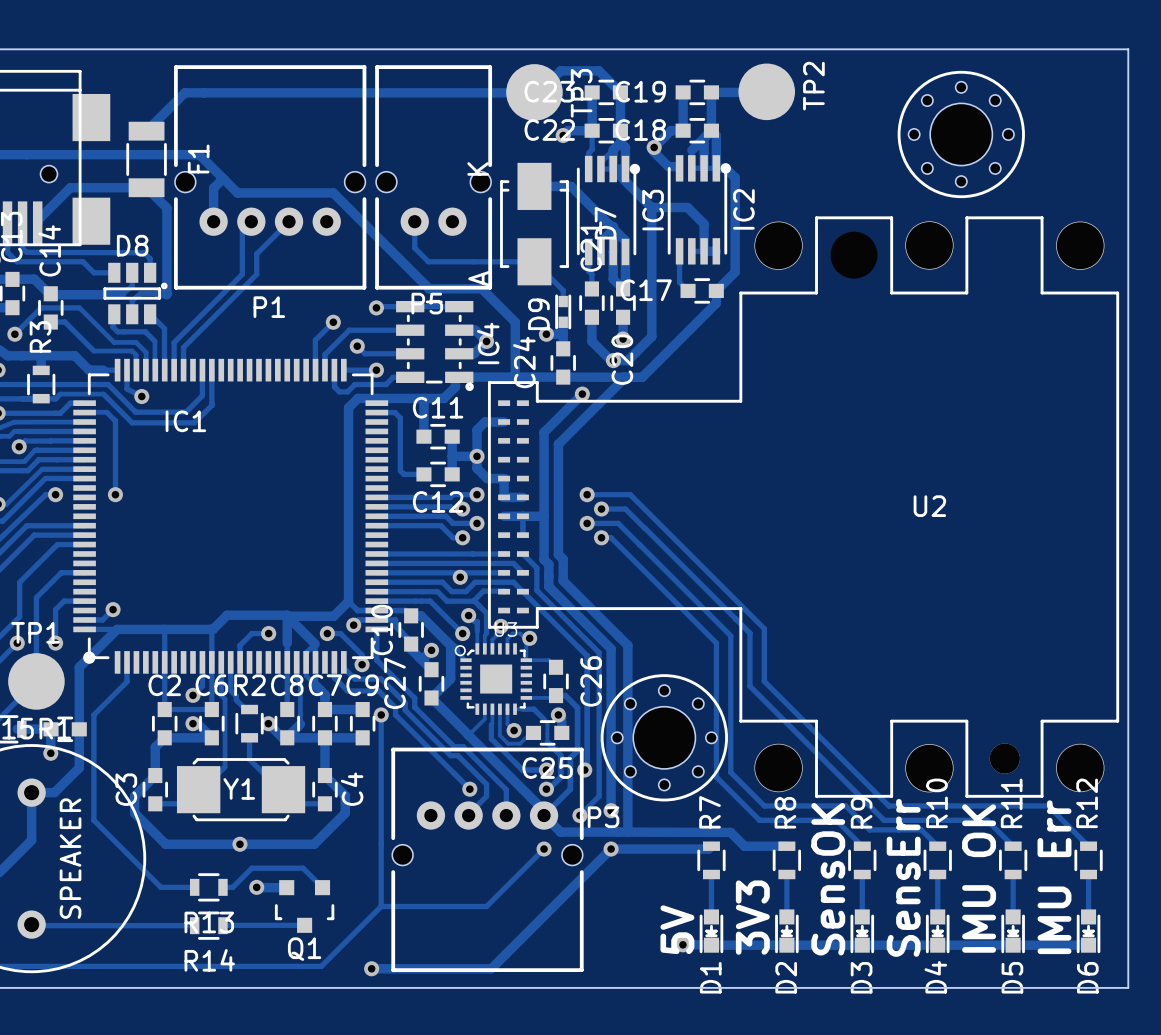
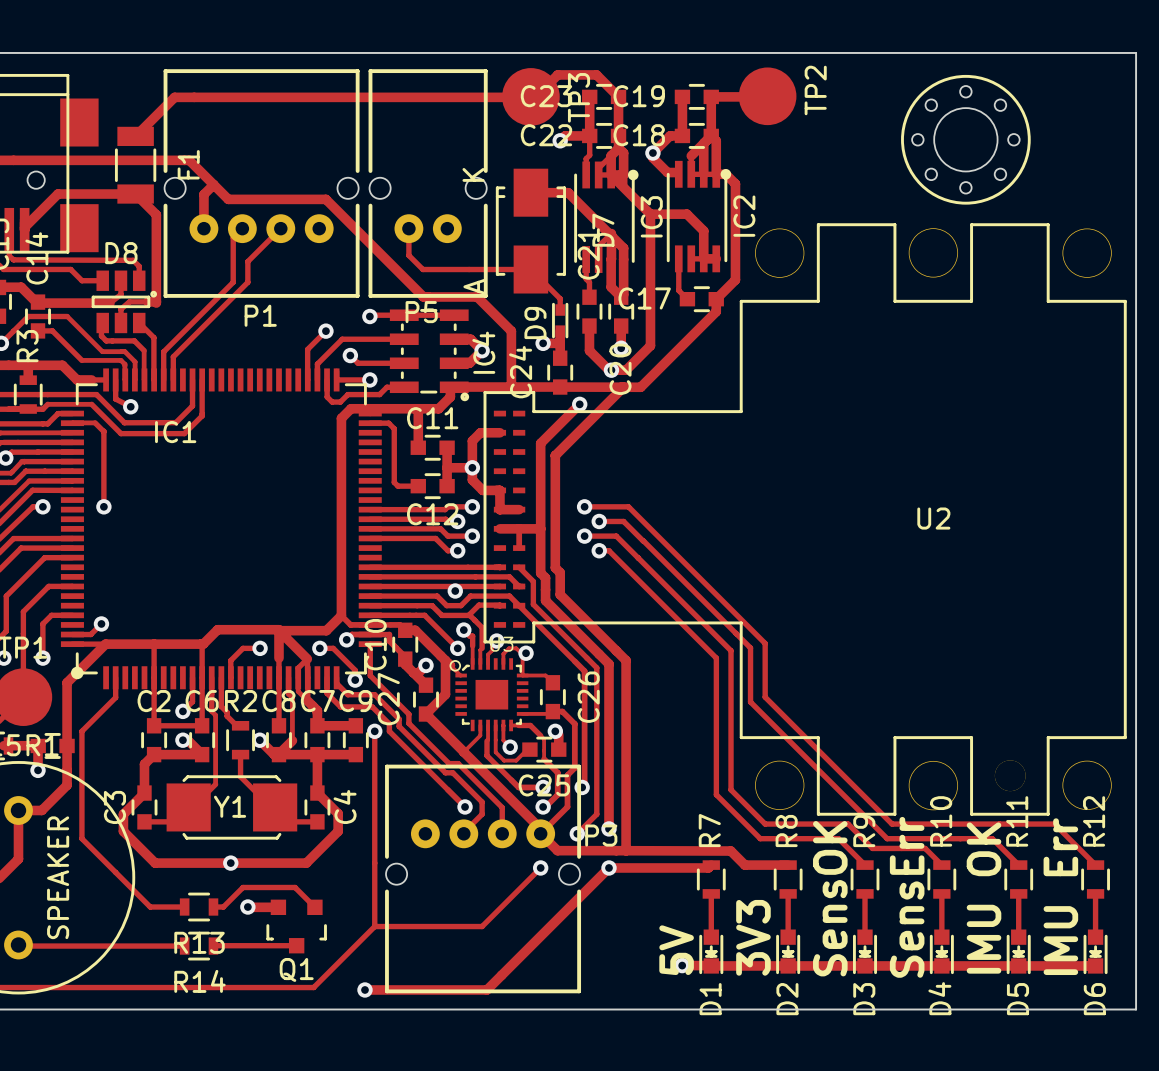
part: (664, 737) -> none

